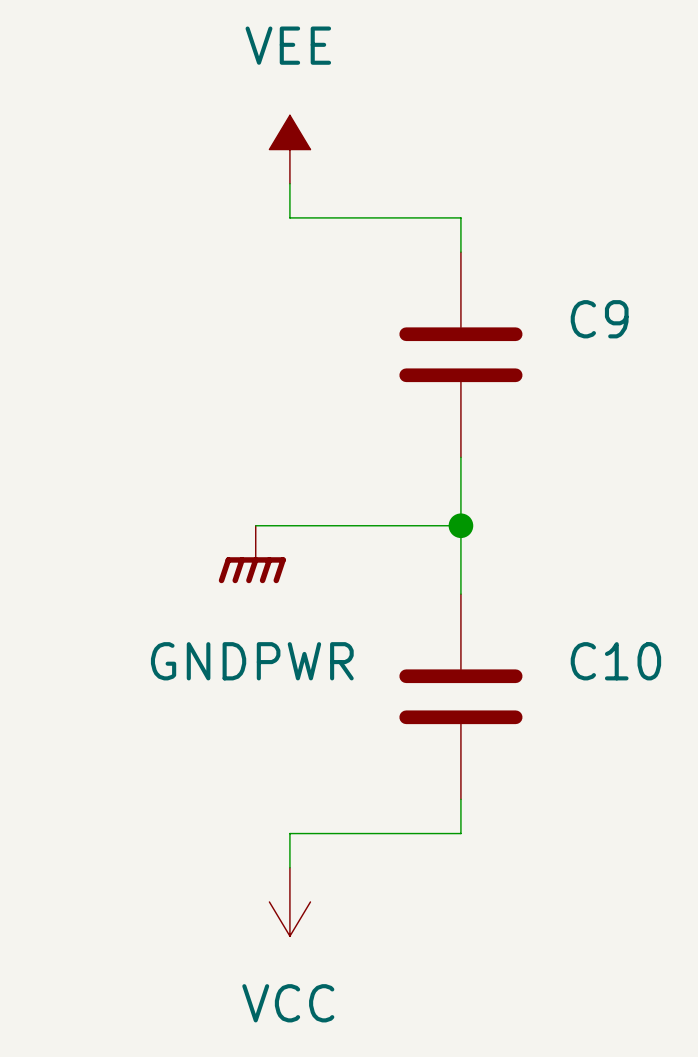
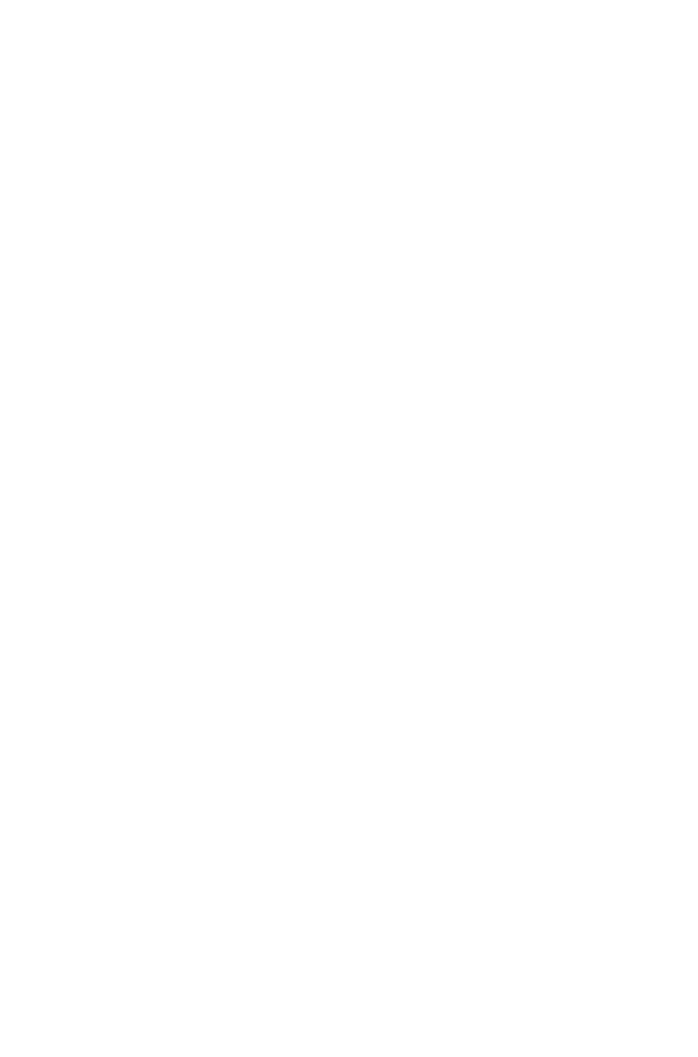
power symbol: VEE (289, 149) -> none
wire: (289, 183) (289, 217) (460, 217) (460, 252) -> none
C9: (460, 354) -> none
wire: (460, 457) (460, 594) -> none
wire: (255, 525) (460, 525) -> none
junction: (460, 525) -> none
power symbol: GNDPWR (252, 554) -> none
C10: (460, 696) -> none
wire: (460, 799) (460, 833) (289, 833) (289, 867) -> none
power symbol: VCC (289, 901) -> none

